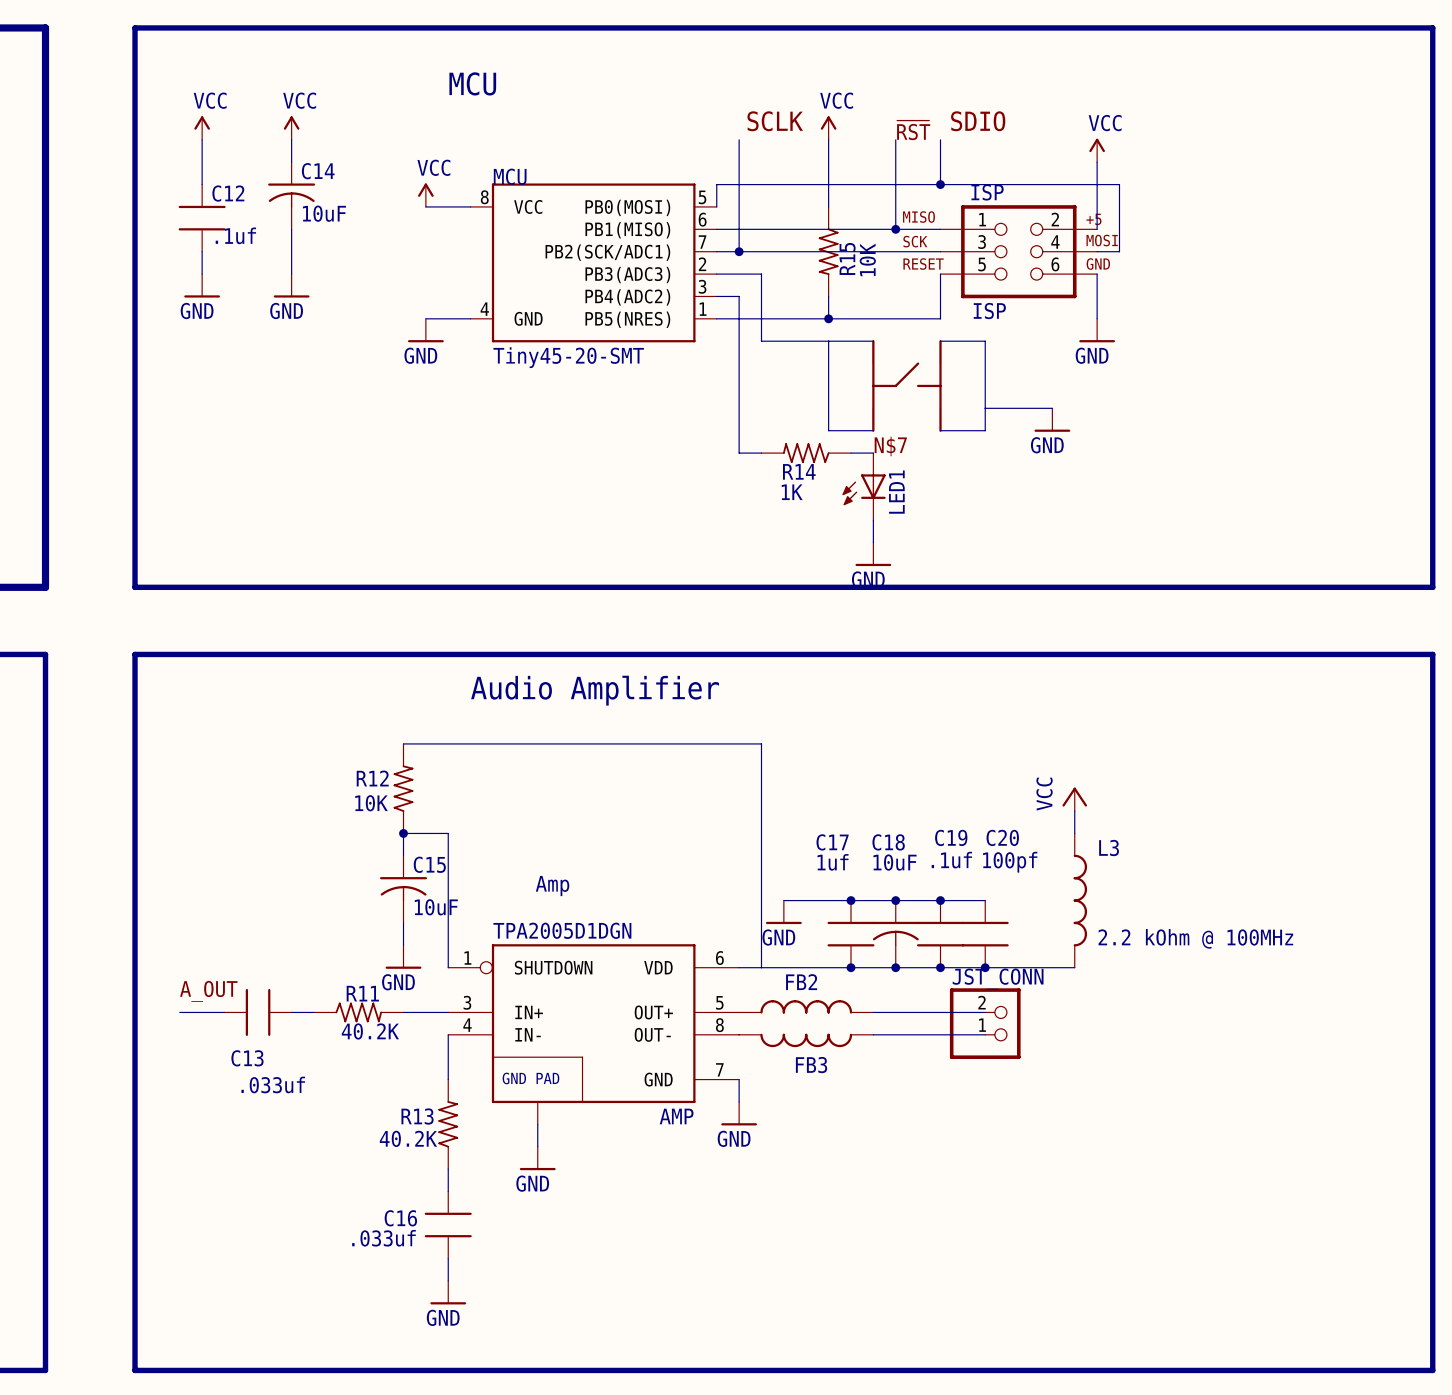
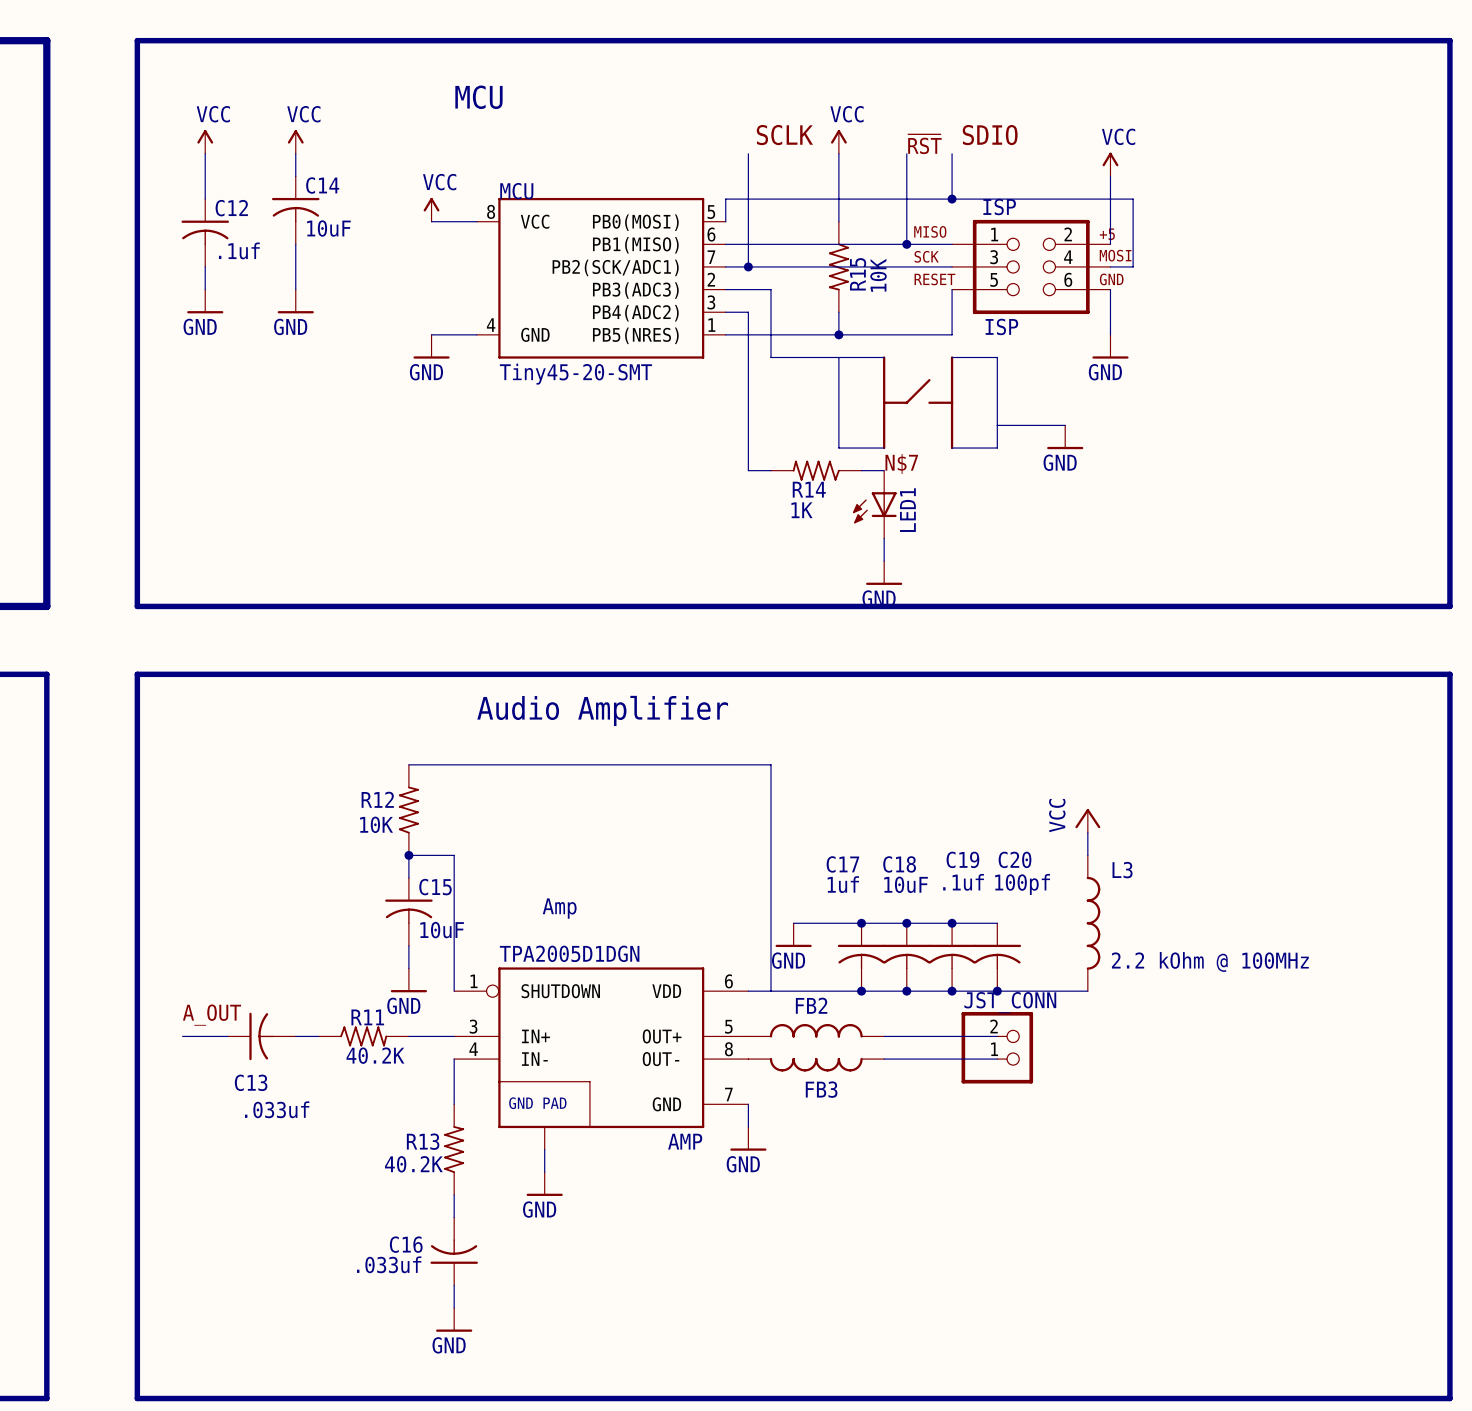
C12 symbol: [178, 184, 226, 252] -> [181, 199, 229, 267]
C17 symbol: [827, 900, 875, 968] -> [837, 923, 886, 992]
C19 symbol: [917, 900, 964, 968] -> [928, 923, 976, 992]
C20 symbol: [961, 900, 1009, 968] -> [973, 923, 1022, 992]
C13 symbol: [224, 988, 292, 1036] -> [227, 1012, 296, 1061]
C16 symbol: [424, 1191, 472, 1259] -> [430, 1217, 478, 1286]

